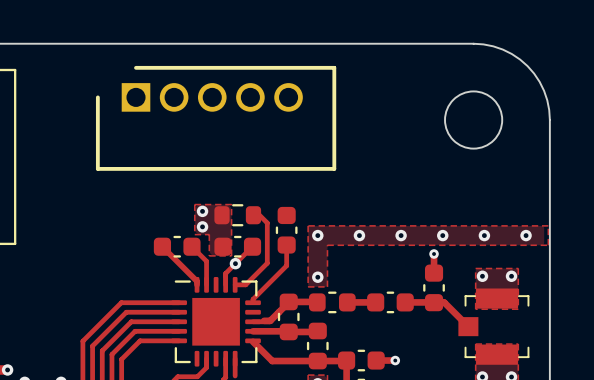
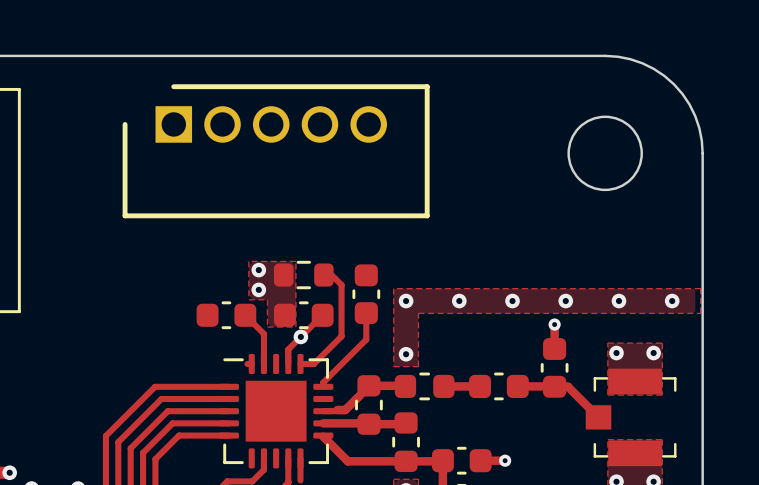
track: (162, 246) (197, 281) (197, 284) -> (247, 363) (251, 363)

